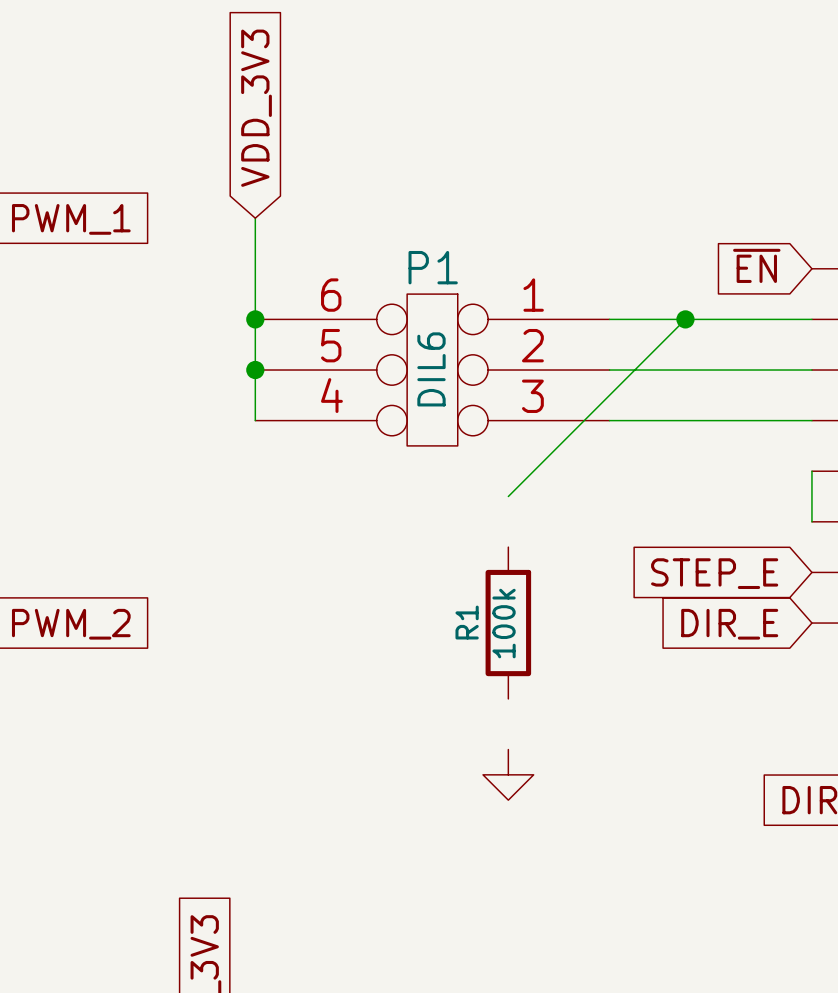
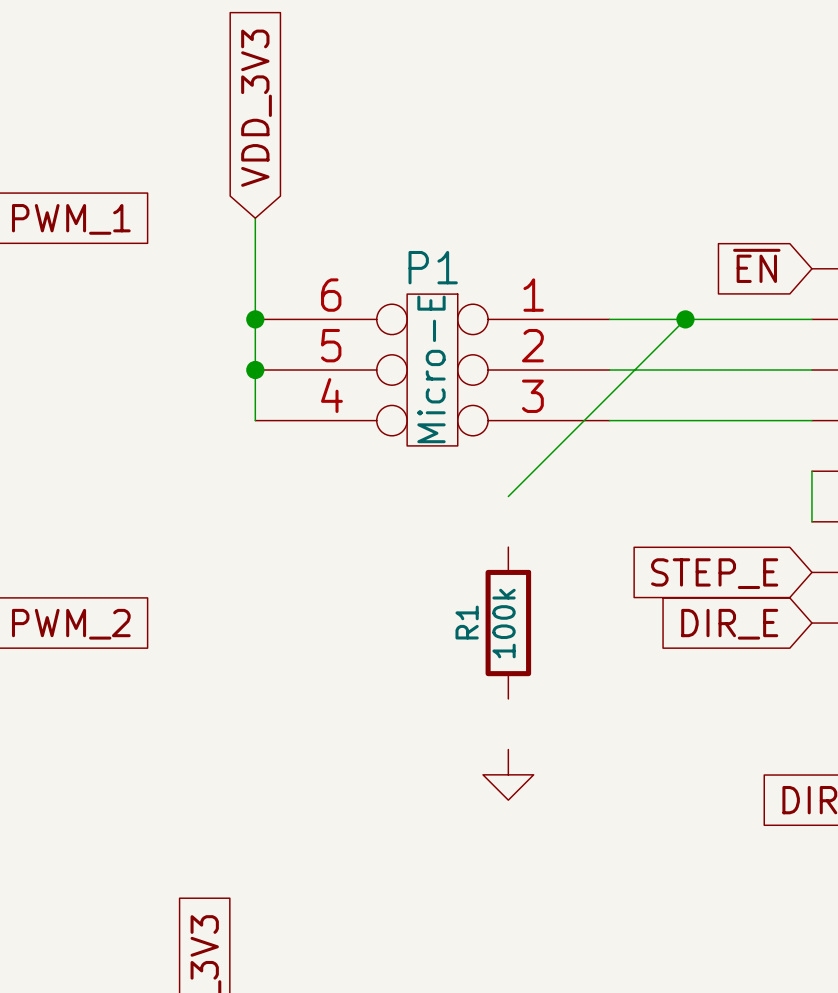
P1 value: DIL6 (431, 369) -> Micro-E (431, 369)

